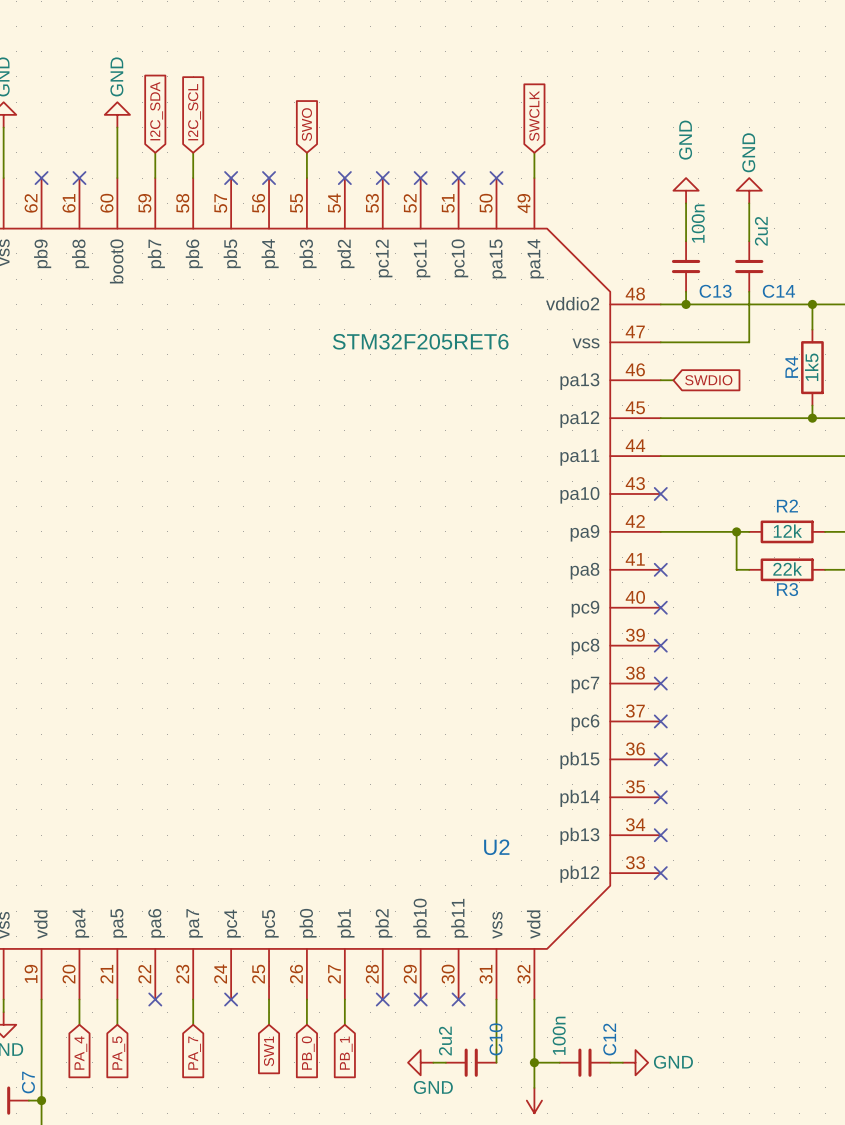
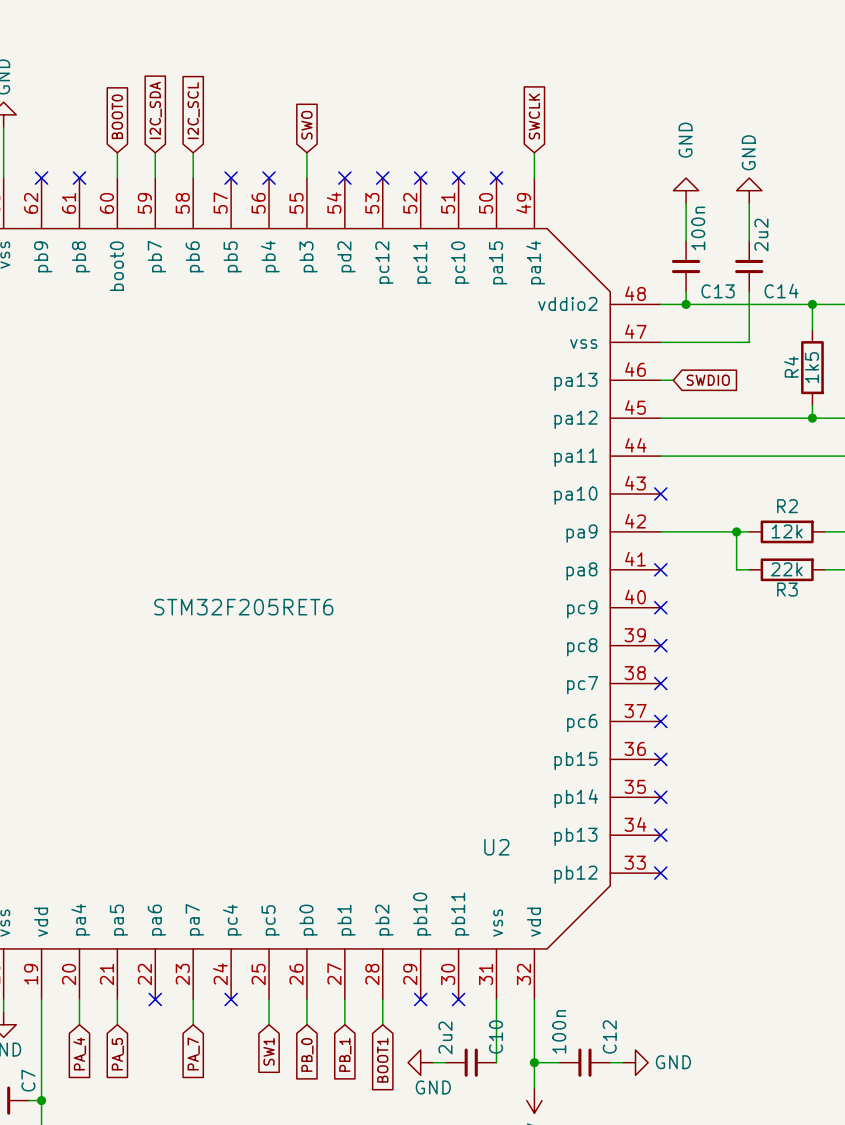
power symbol: GND (117, 114) -> none
global label: none -> BOOT0 (117, 116)
wire: (117, 127) (117, 152) -> none
U2 value position: STM32F205RET6 (420, 341) -> STM32F205RET6 (243, 607)
wire: none -> (382, 999) (382, 1024)
no-connect mark: (382, 999) -> none
global label: none -> BOOT1 (382, 1060)

